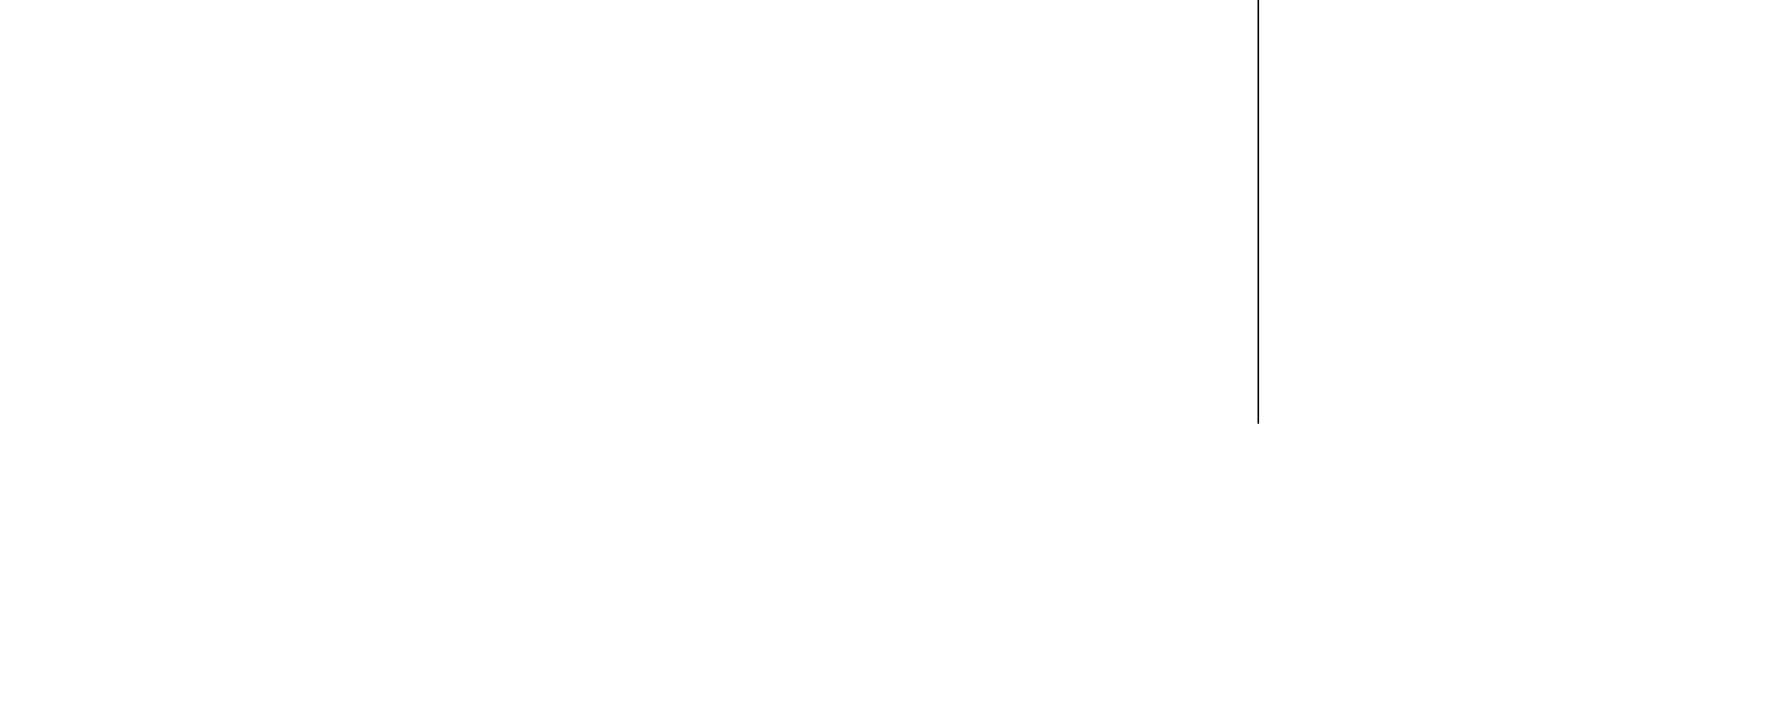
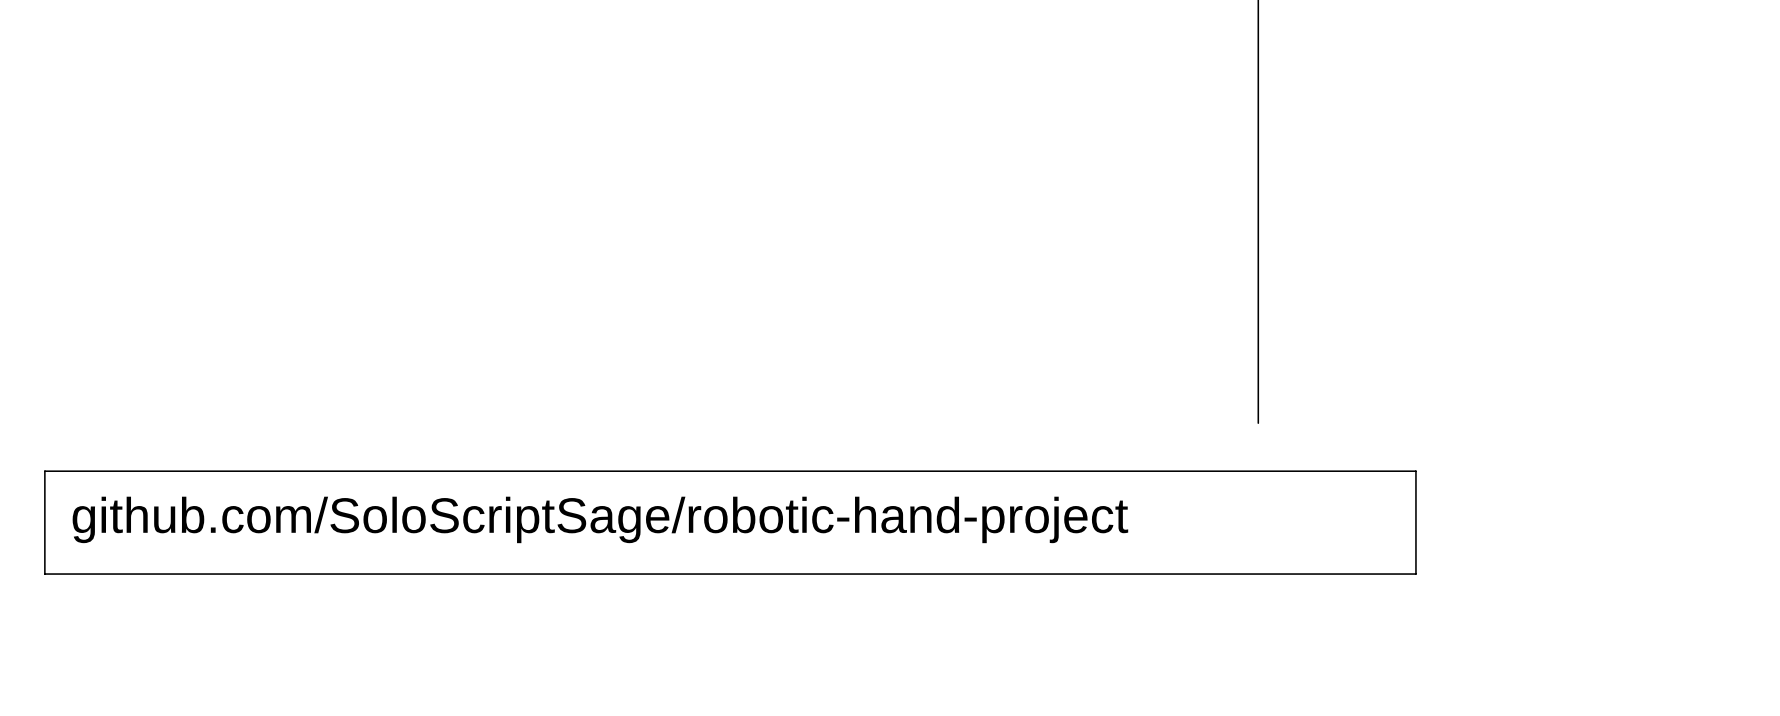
line: none -> (44, 471) (1415, 471) (1415, 574) (44, 574) (44, 471)
text: none -> github.com/SoloScriptSage/robotic-hand-project (600, 519)

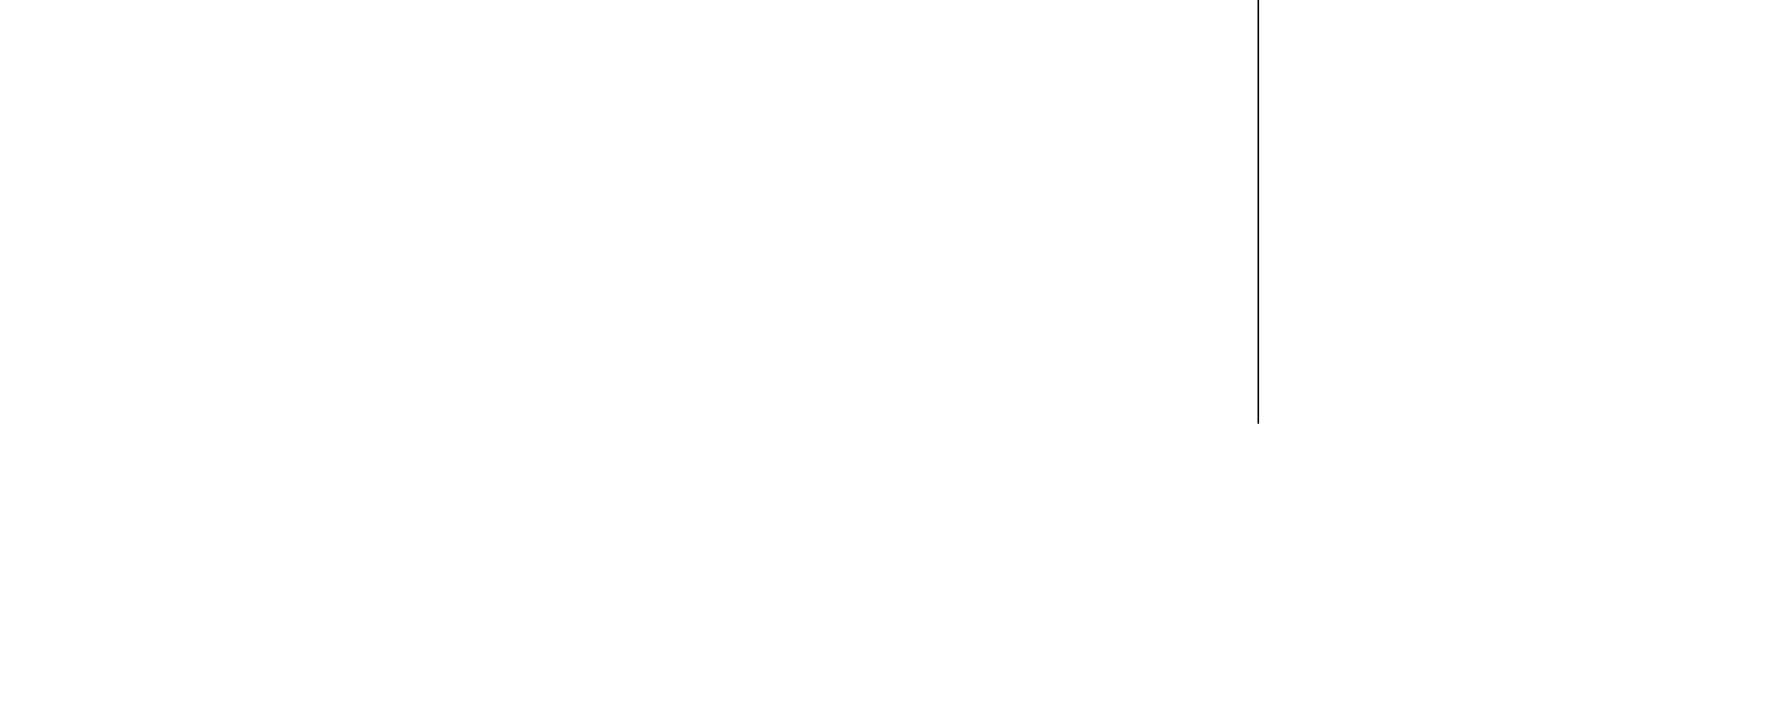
line: (44, 471) (1415, 471) (1415, 574) (44, 574) (44, 471) -> none
text: github.com/SoloScriptSage/robotic-hand-project (600, 519) -> none

